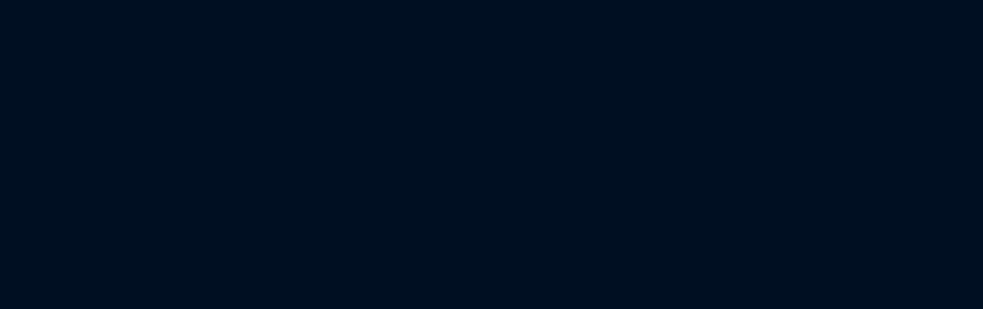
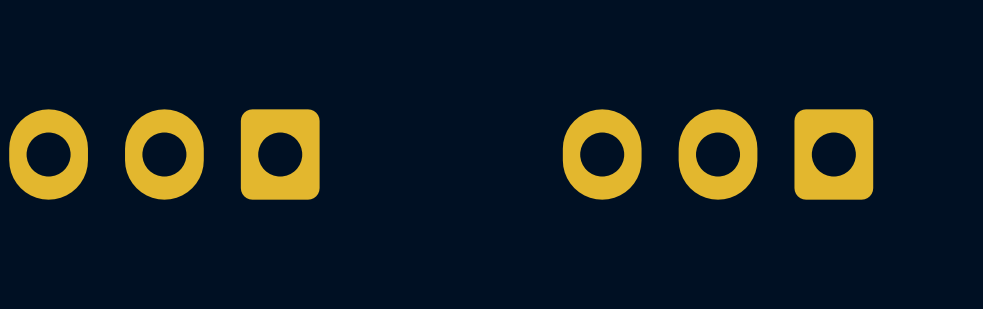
part: none -> (164, 154)
part: none -> (718, 154)

